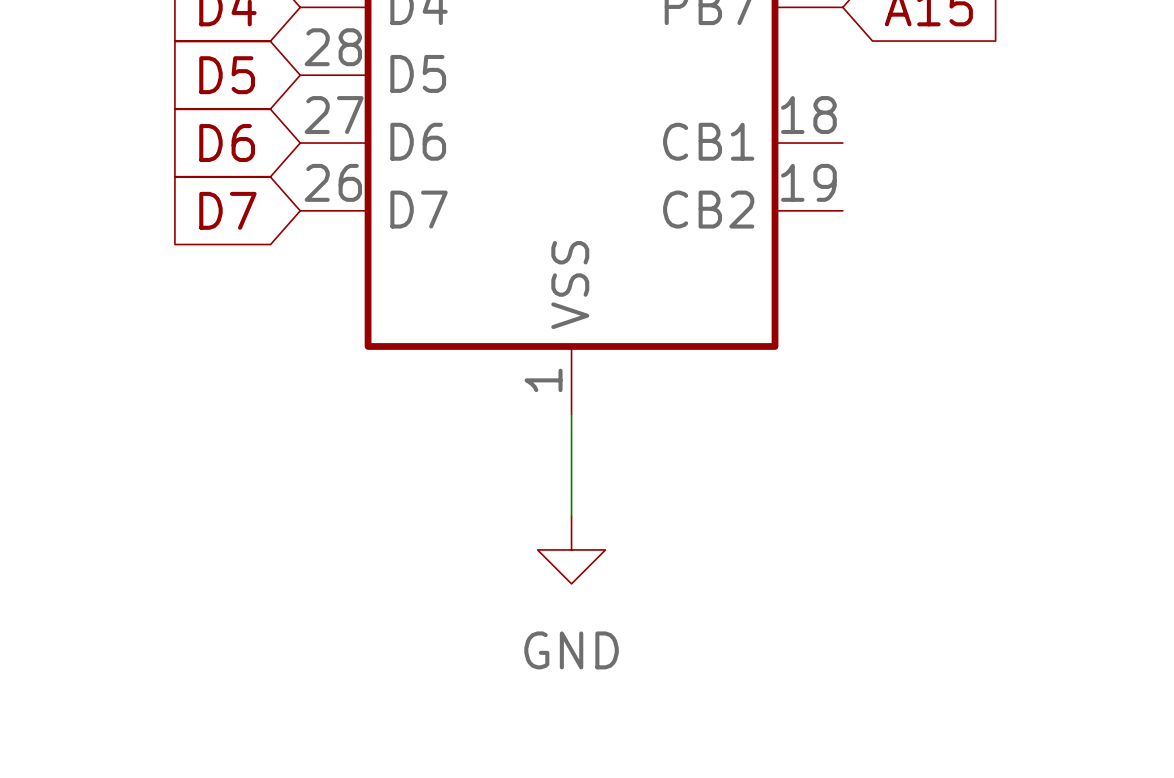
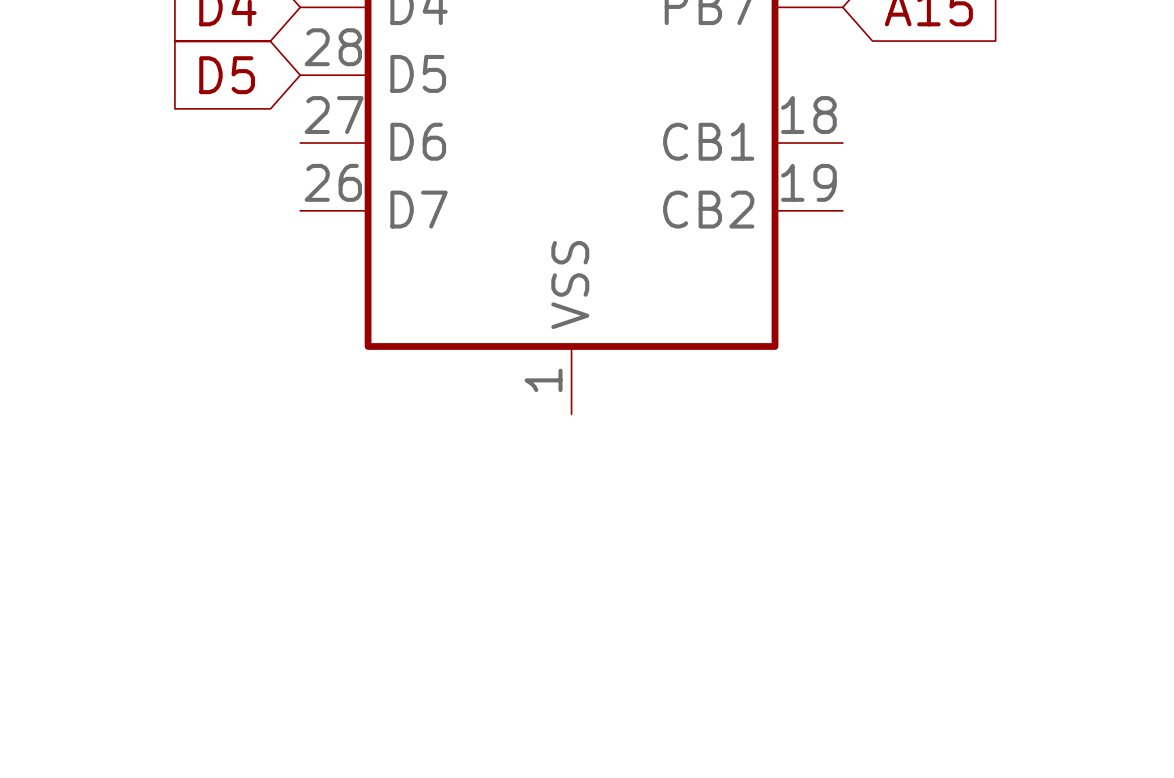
global label: D6 (227, 143) -> none
global label: D7 (227, 210) -> none
wire: (571, 414) (571, 516) -> none
power symbol: GND (571, 549) -> none

